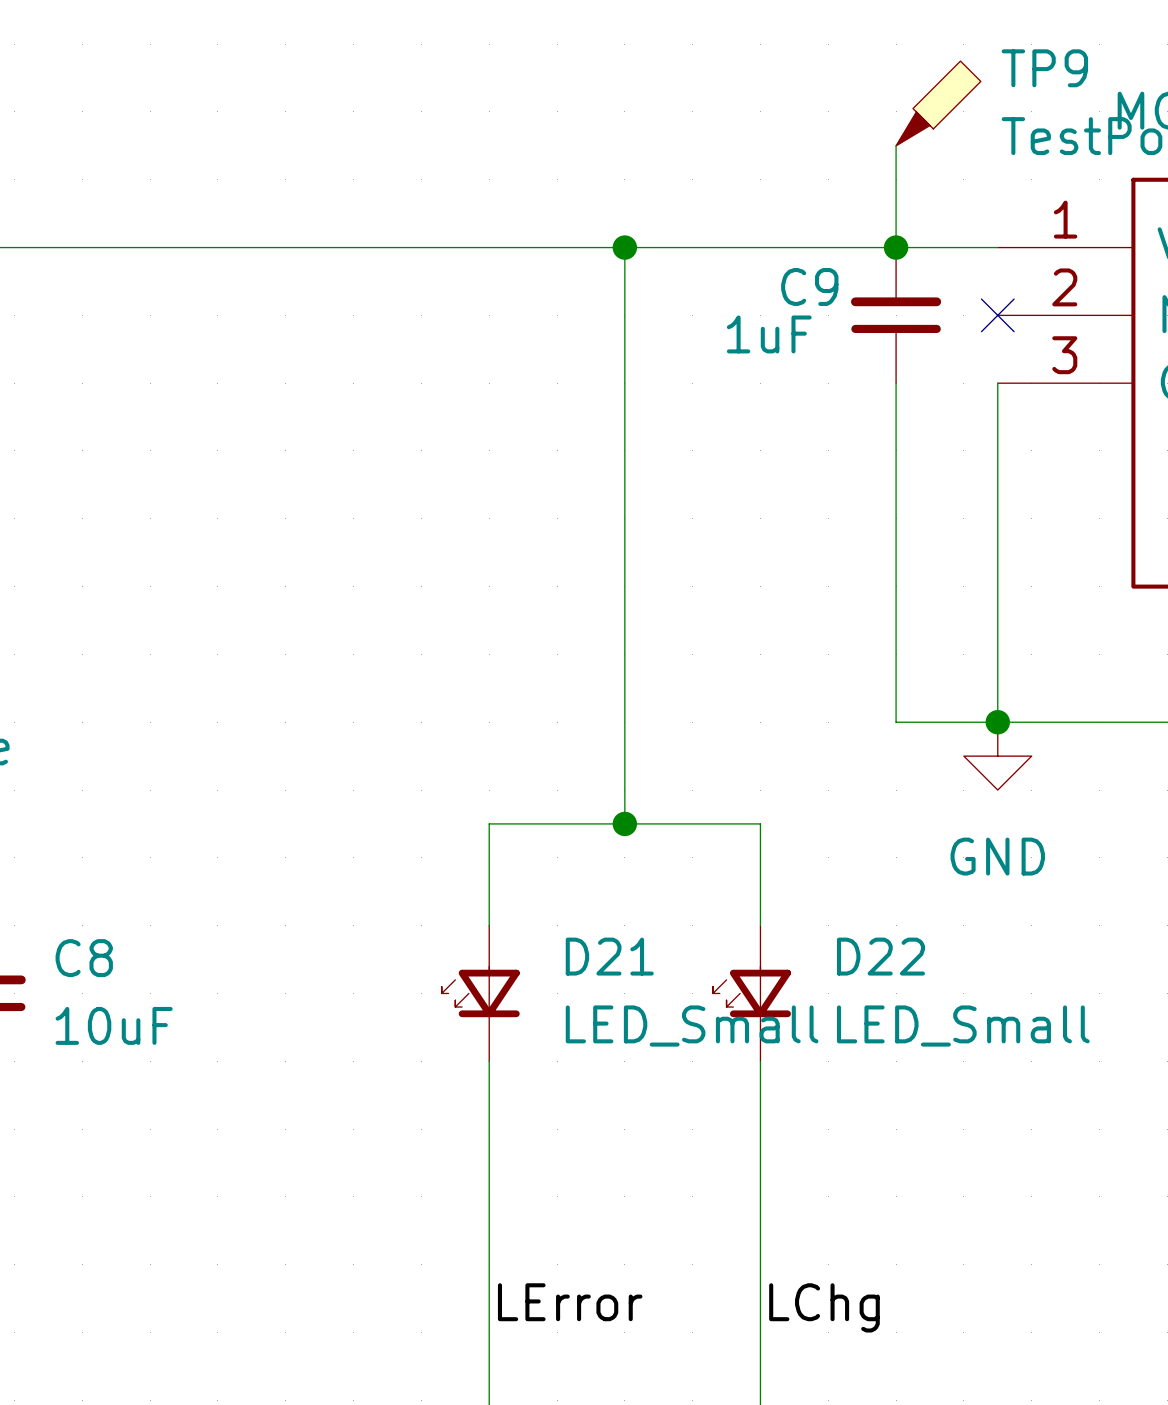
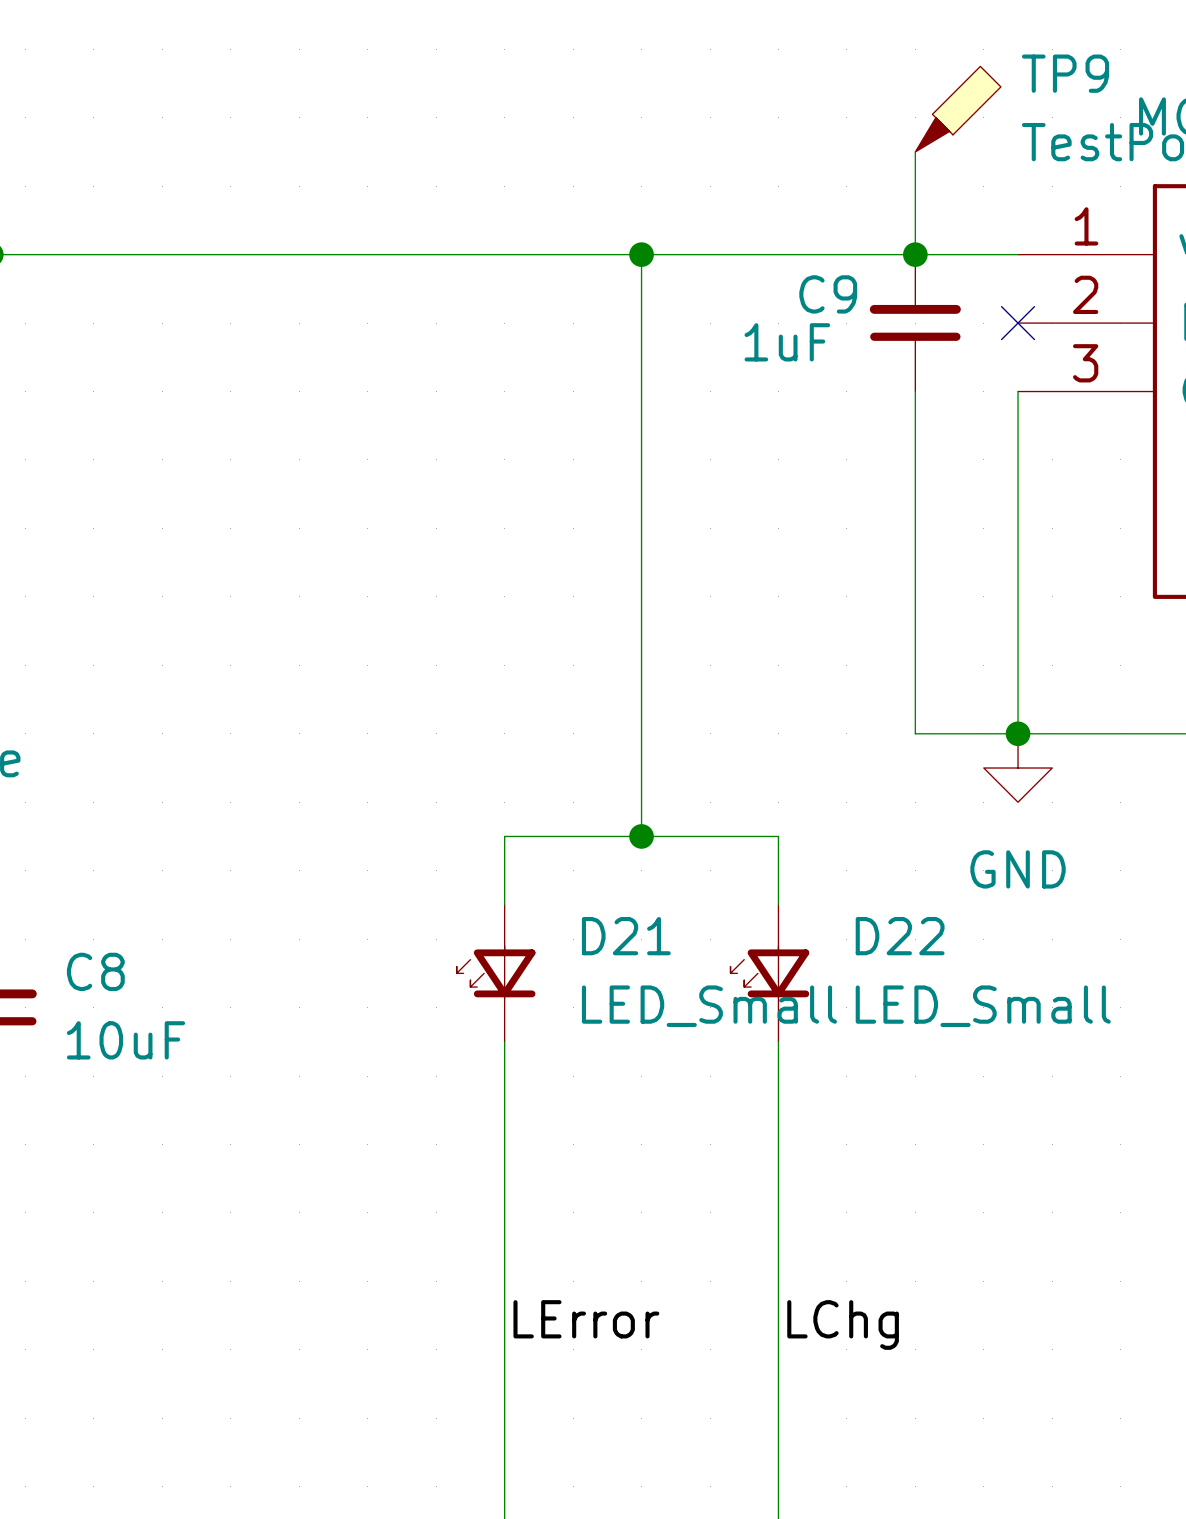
D21 position: (480, 993) -> (496, 973)
D22 position: (751, 993) -> (769, 973)

